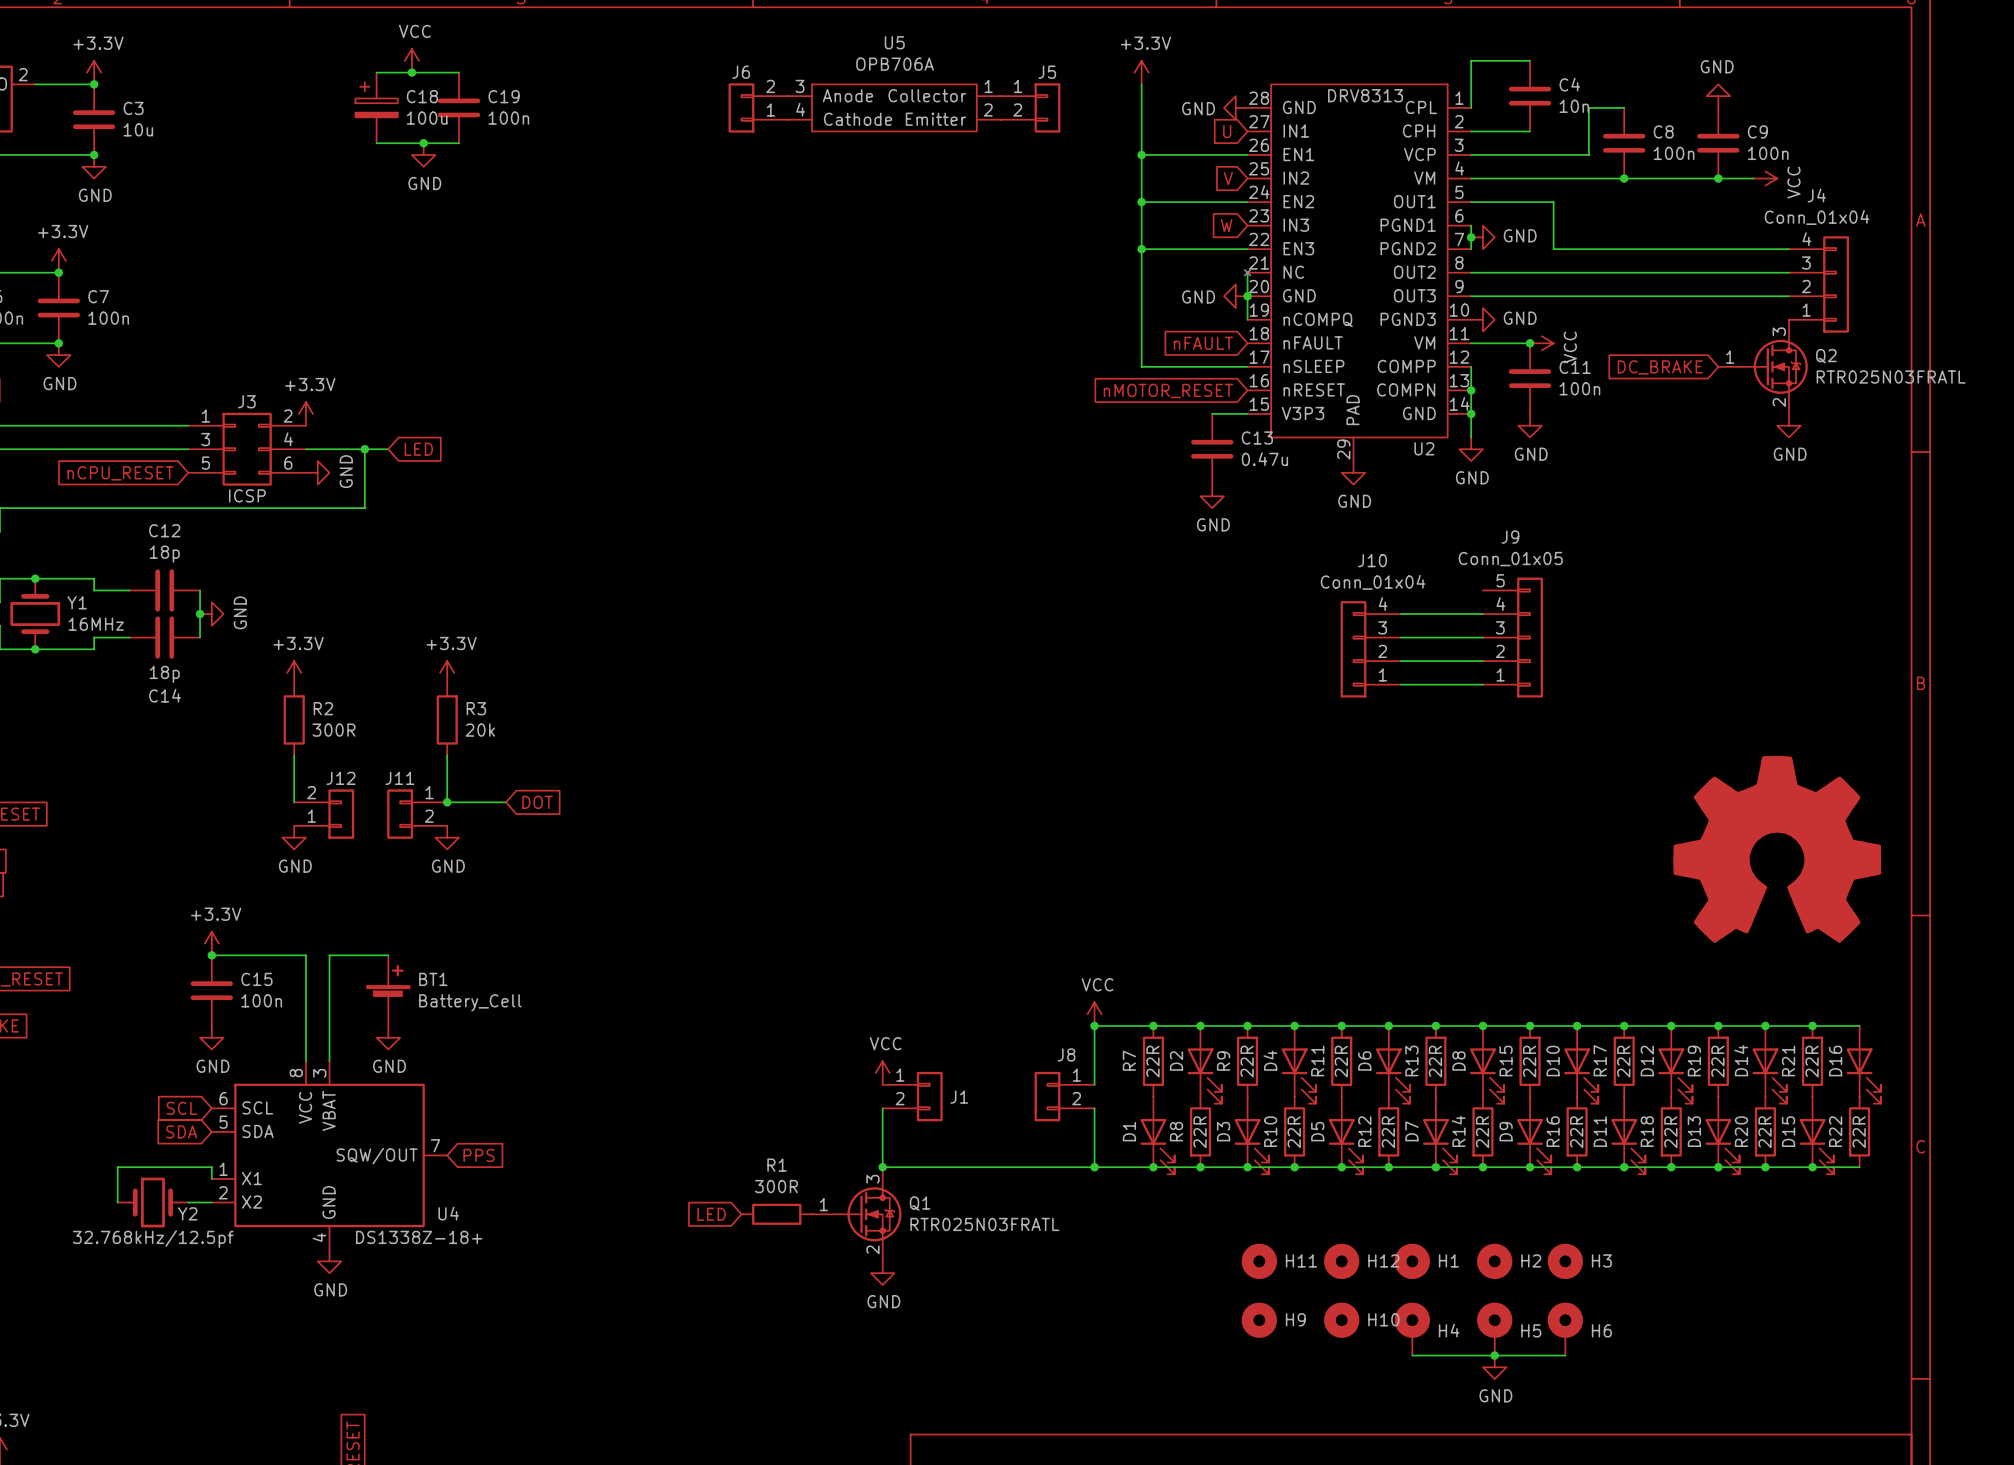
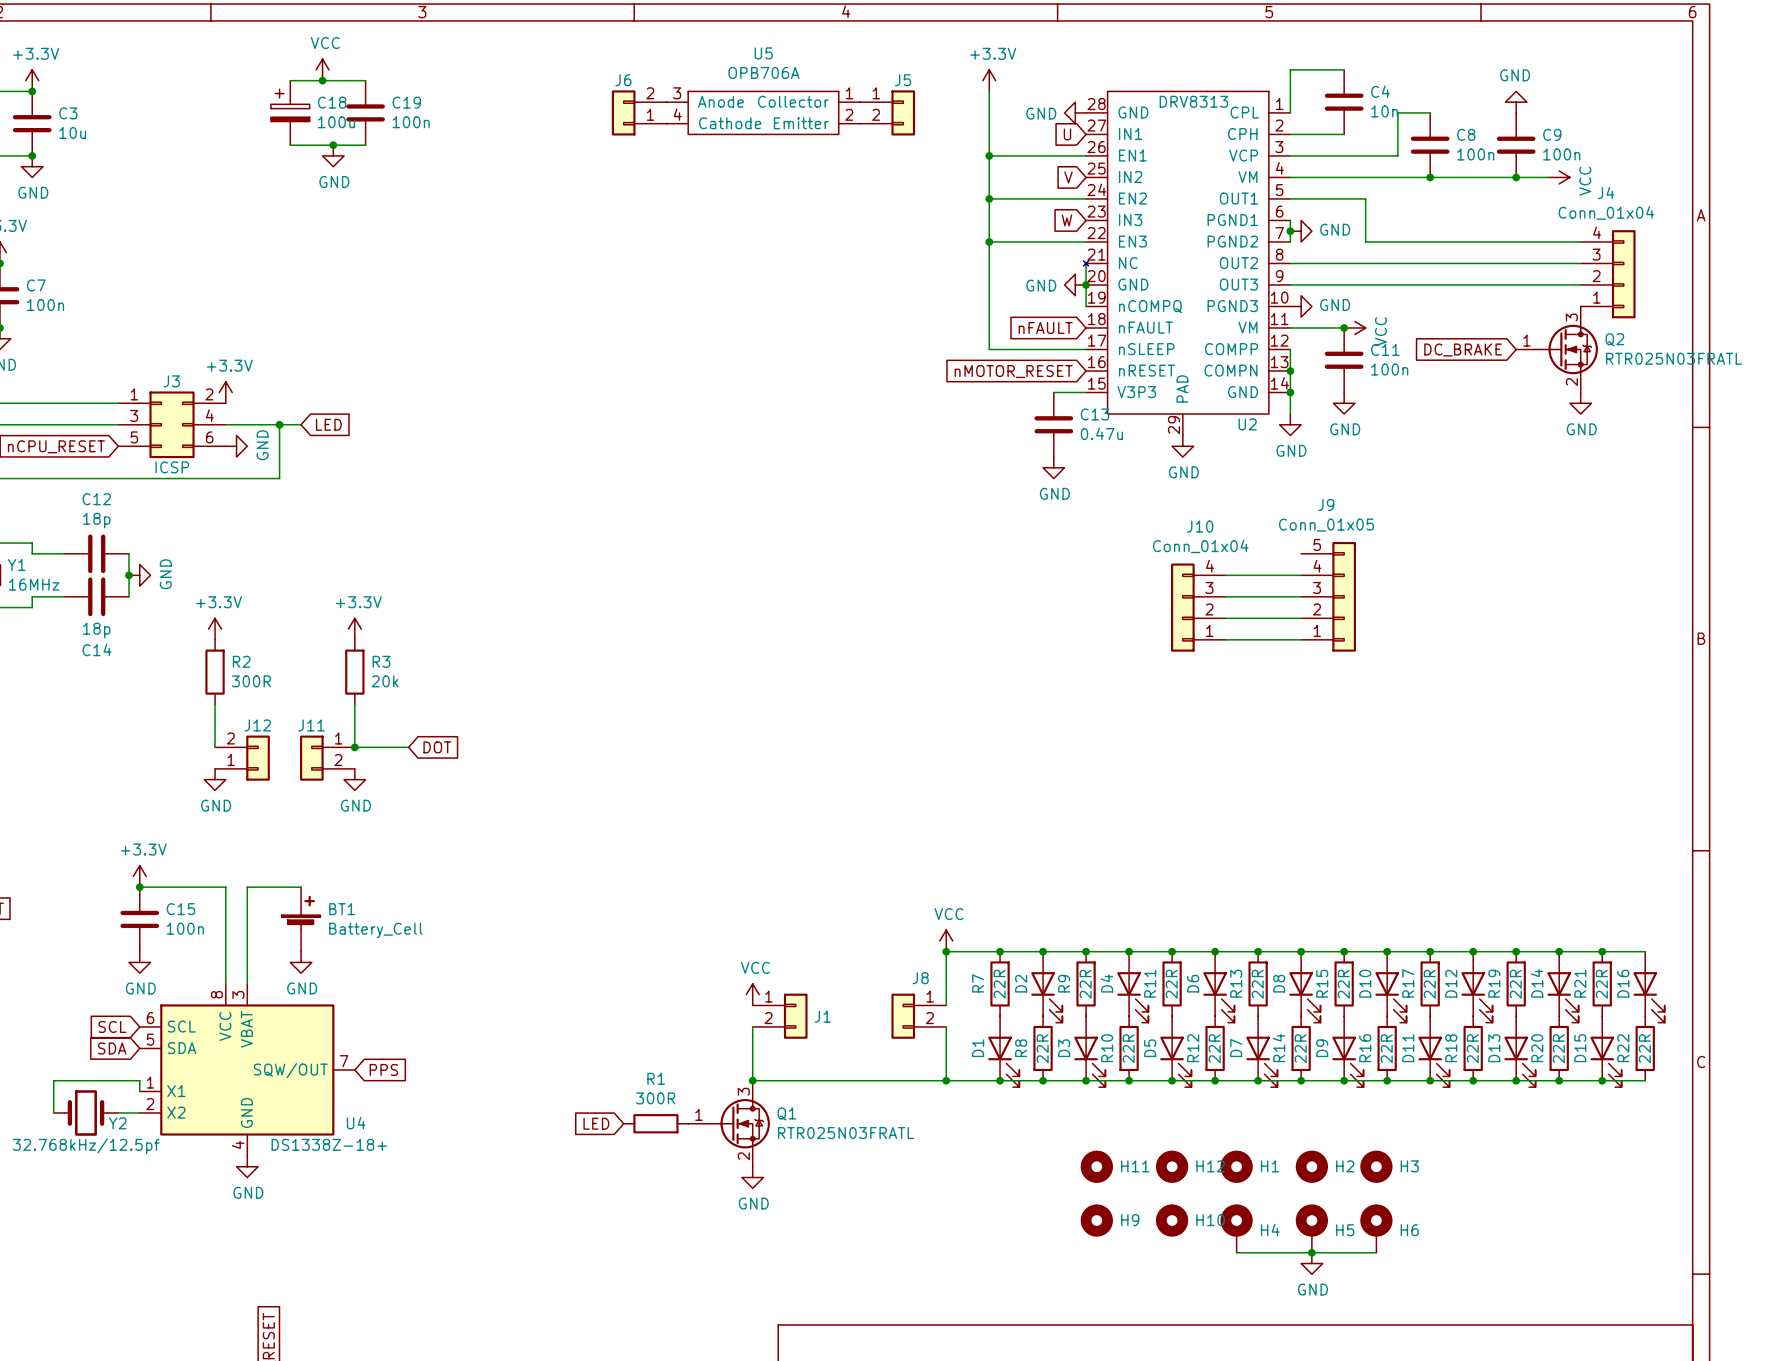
power symbol: (1777, 849) -> none

